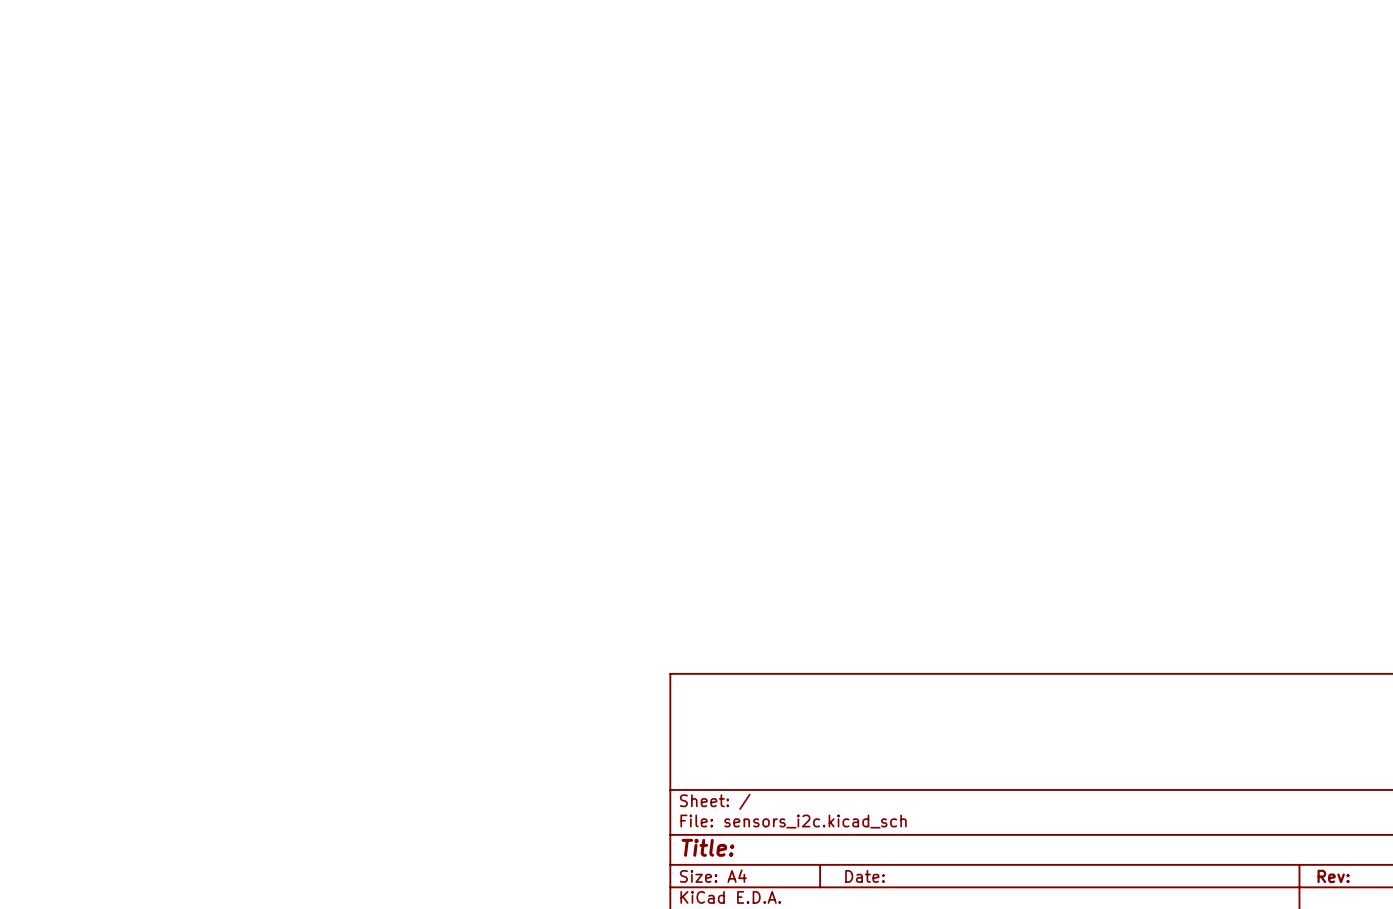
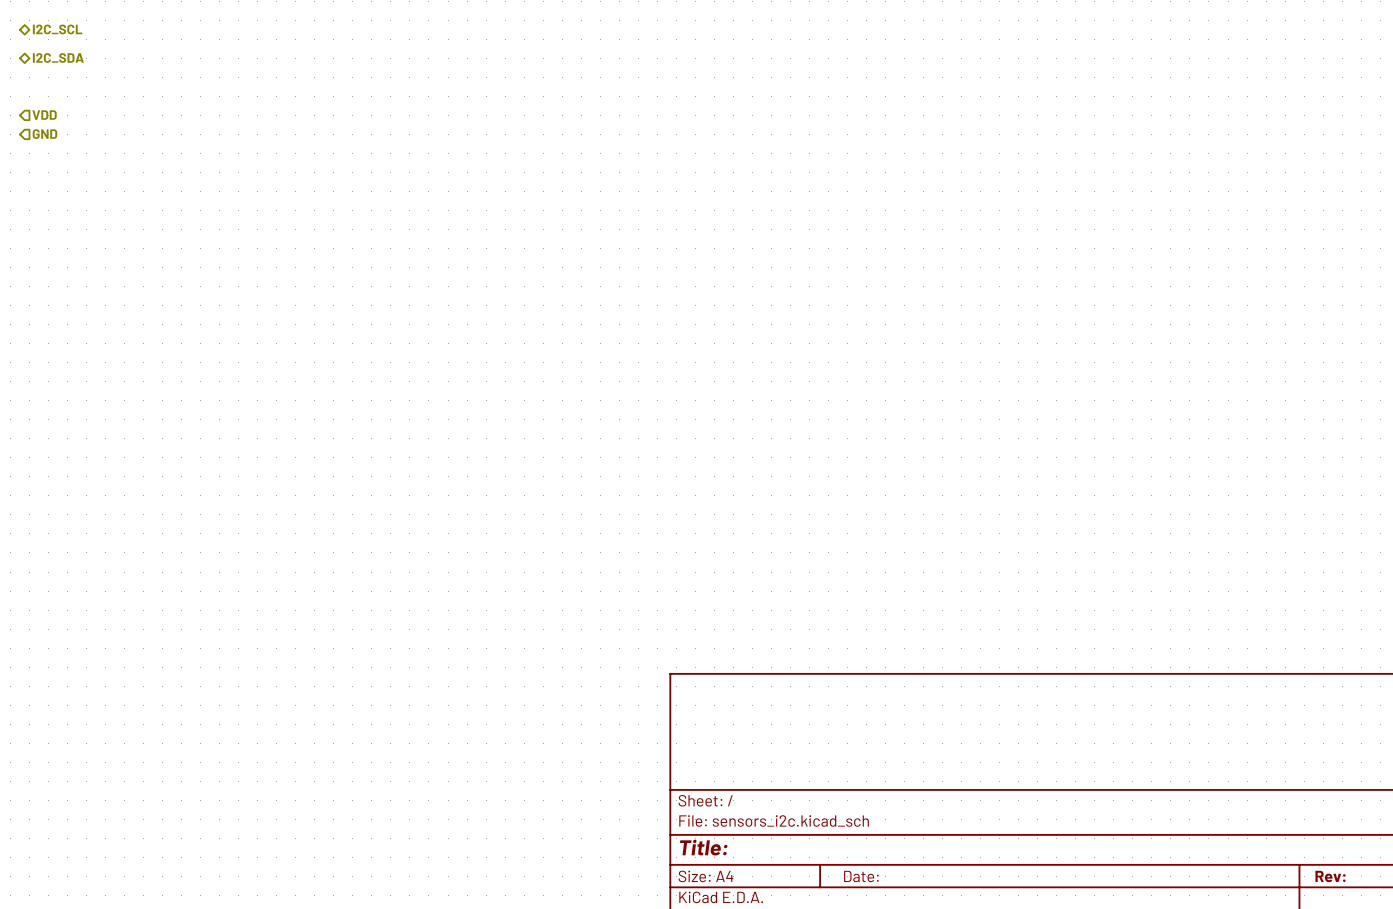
hierarchical label: none -> I2C_SCL (57, 29)
hierarchical label: none -> I2C_SDA (58, 57)
hierarchical label: none -> VDD (44, 115)
hierarchical label: none -> GND (44, 134)

